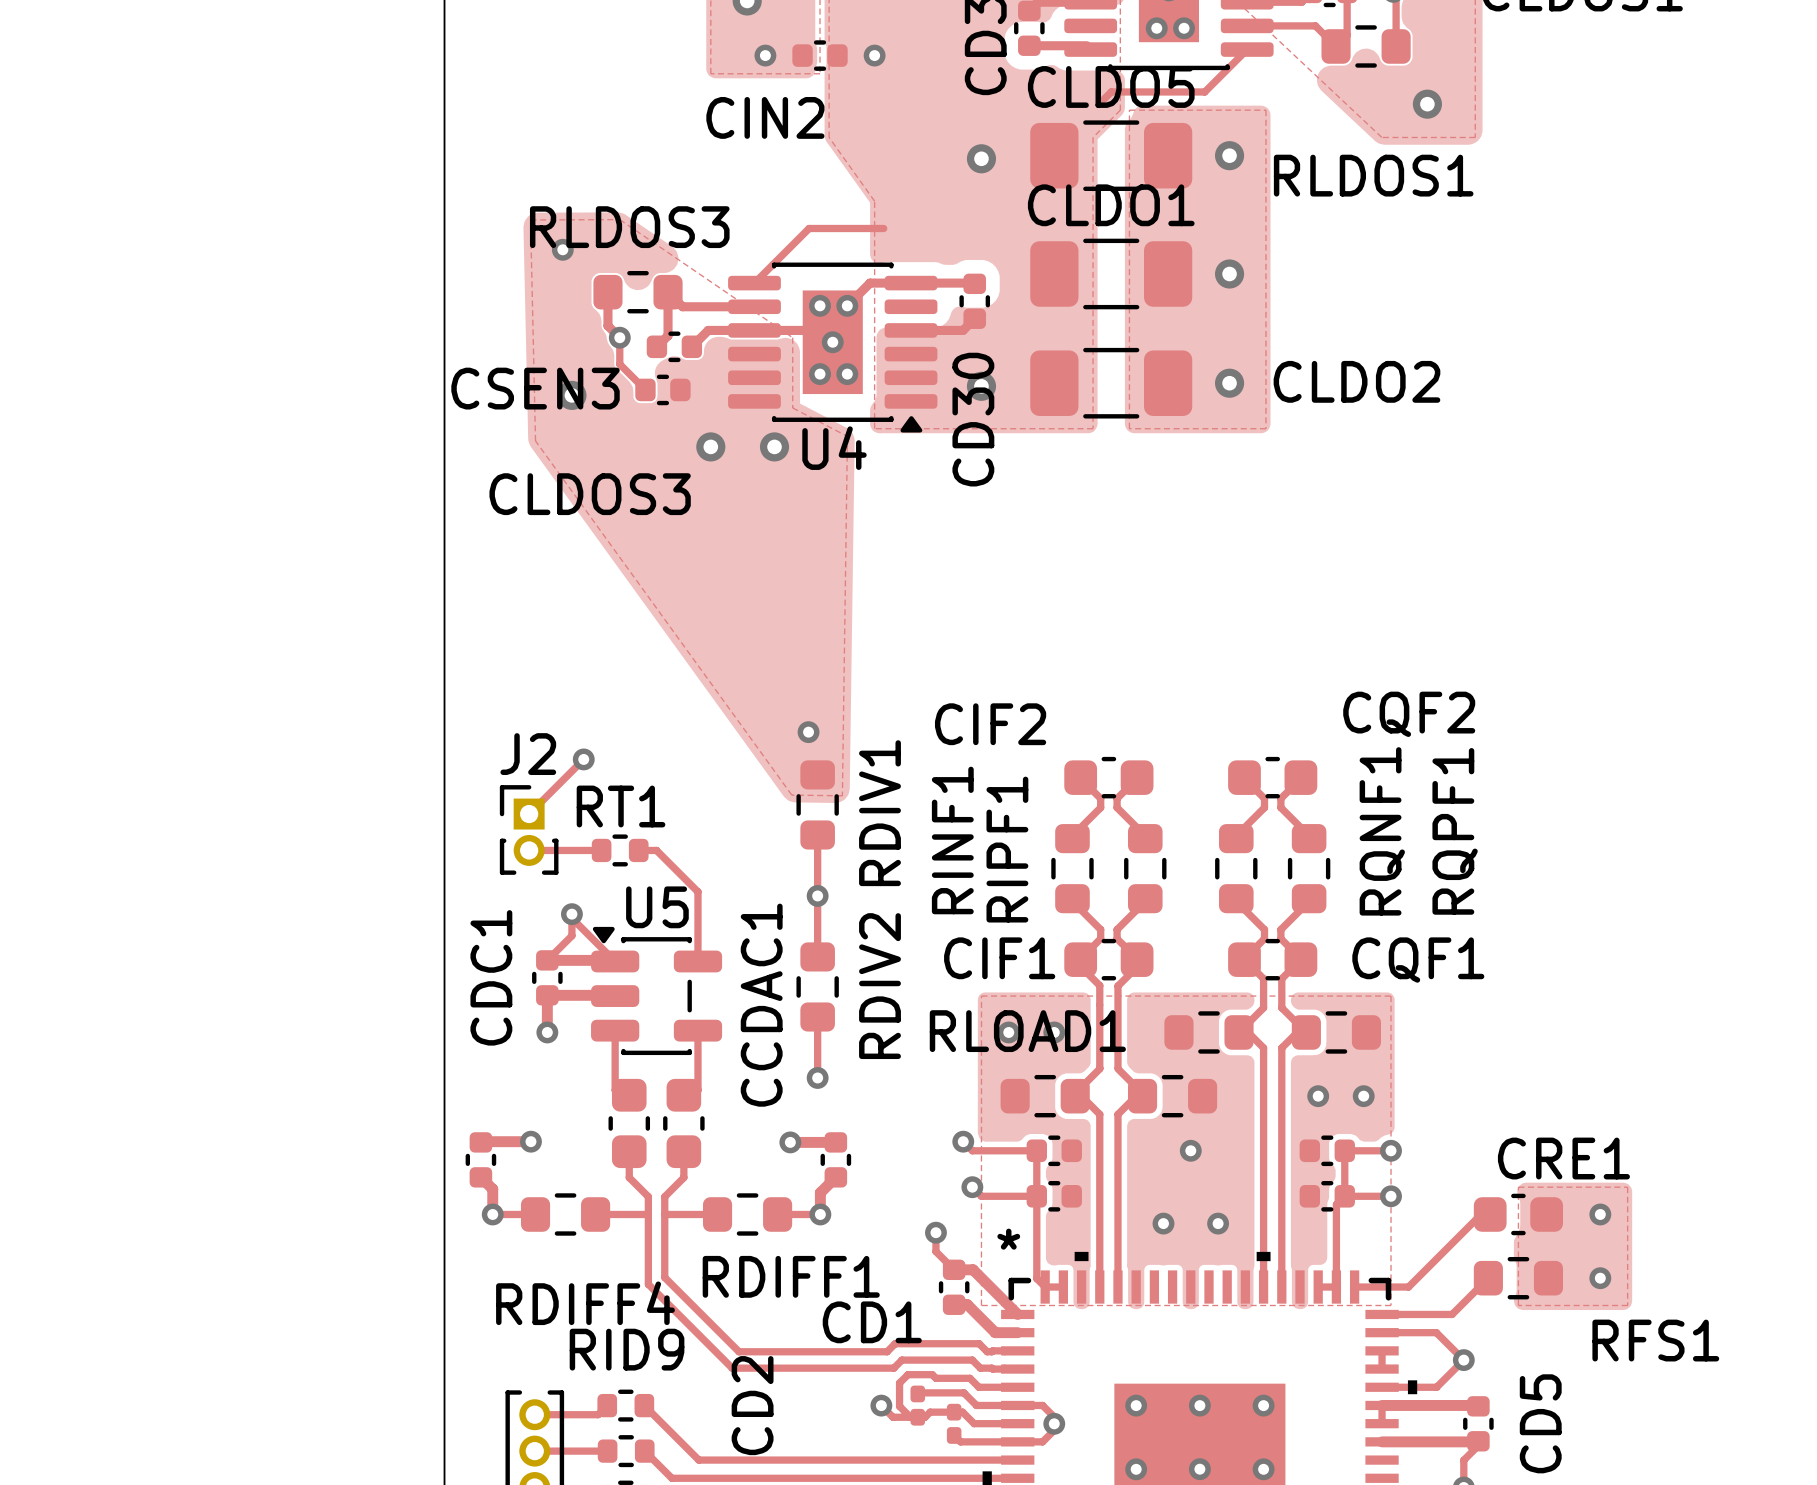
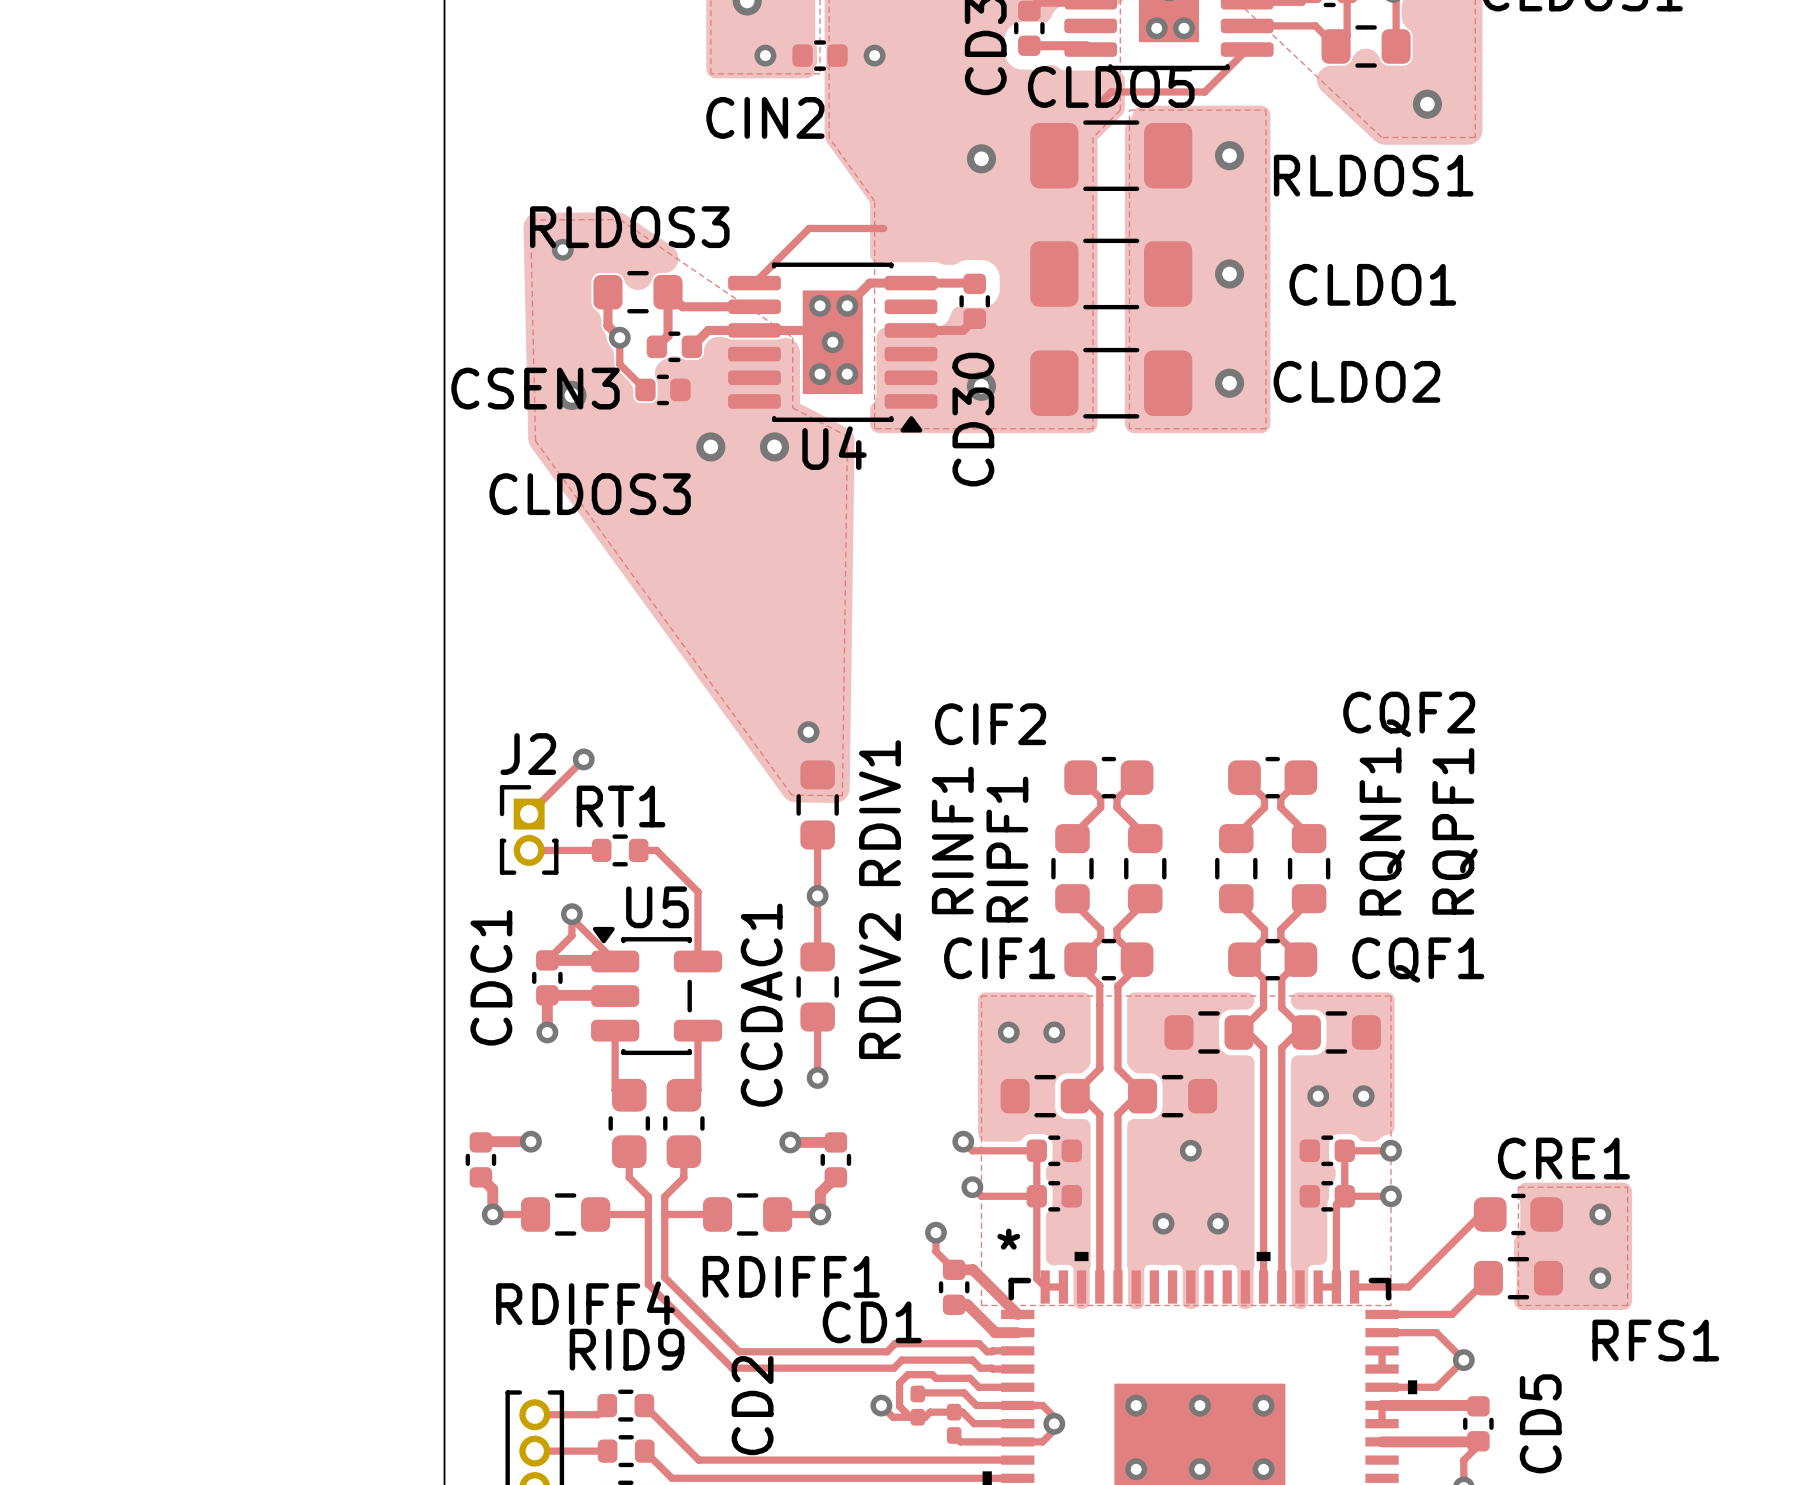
CLDO1 name position: CLDO1 (1111, 205) -> CLDO1 (1372, 284)
RLOAD1 name: RLOAD1 (1027, 1031) -> none

